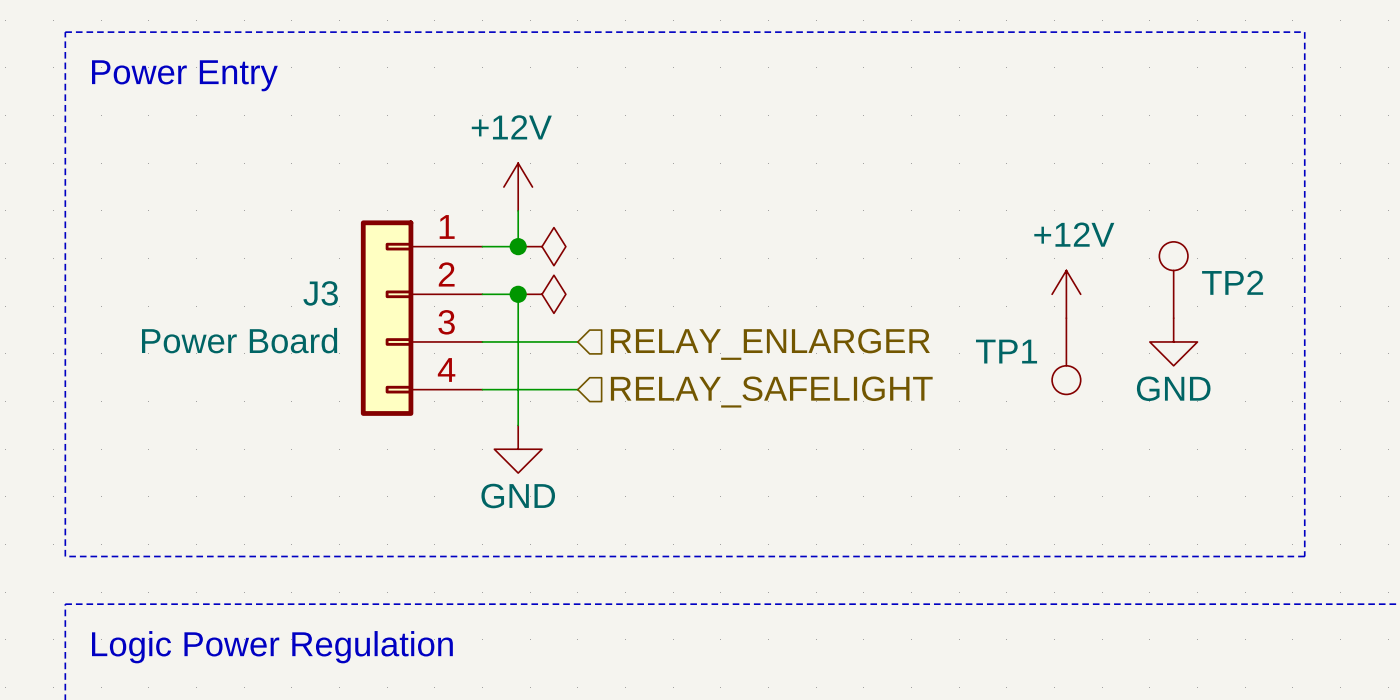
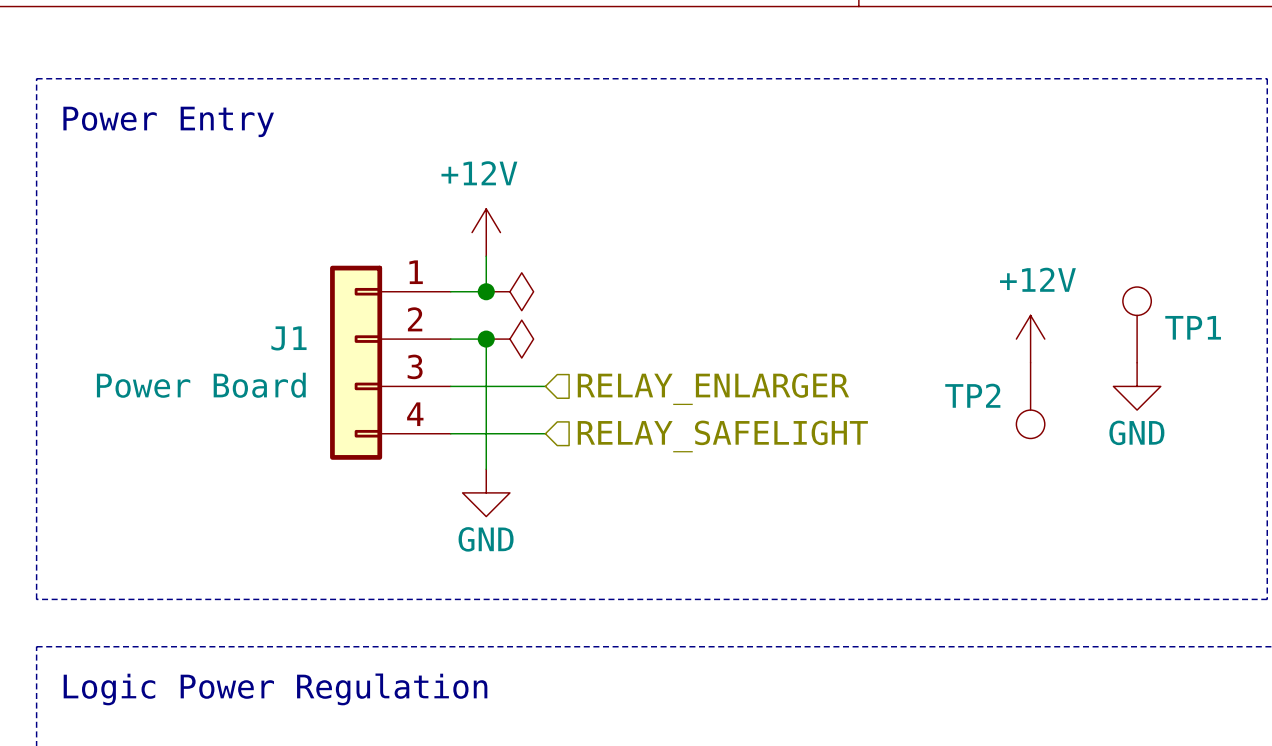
TP2 name: TP2 (1232, 282) -> TP1 (1193, 327)
J3 name: J3 (320, 293) -> J1 (288, 338)
TP1 name: TP1 (1006, 351) -> TP2 (972, 395)

